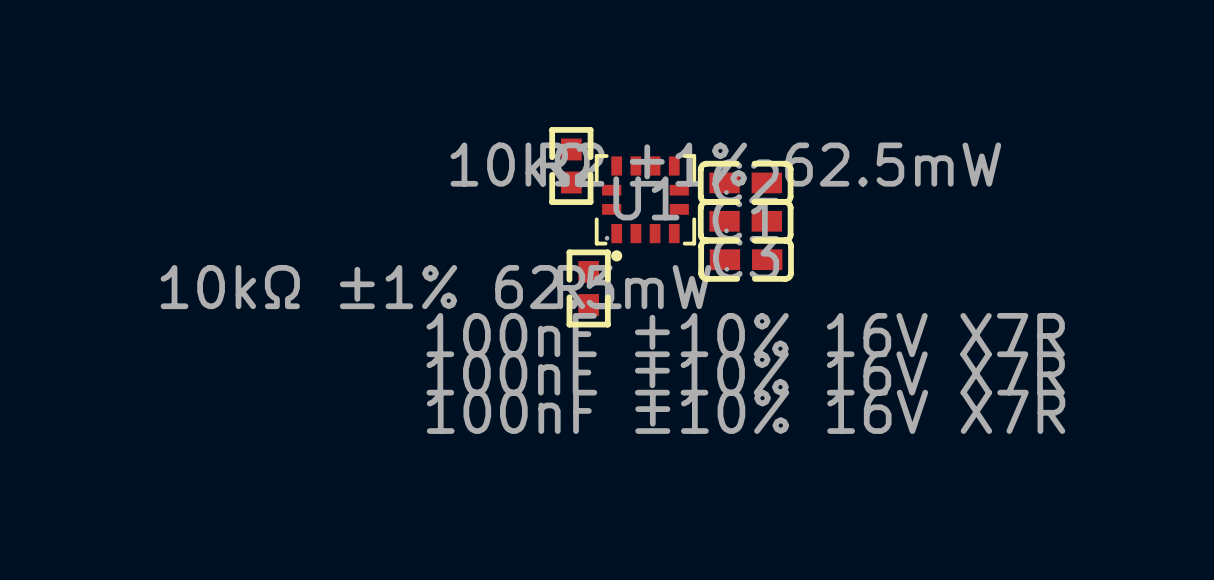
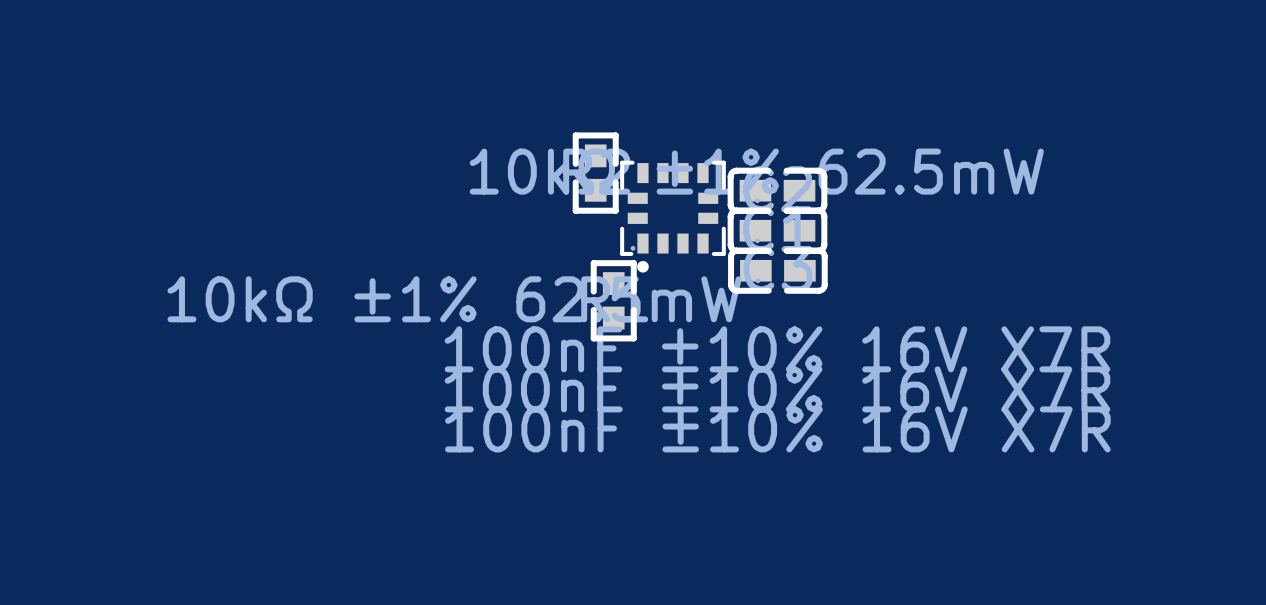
U1 name: U1 (646, 198) -> none

